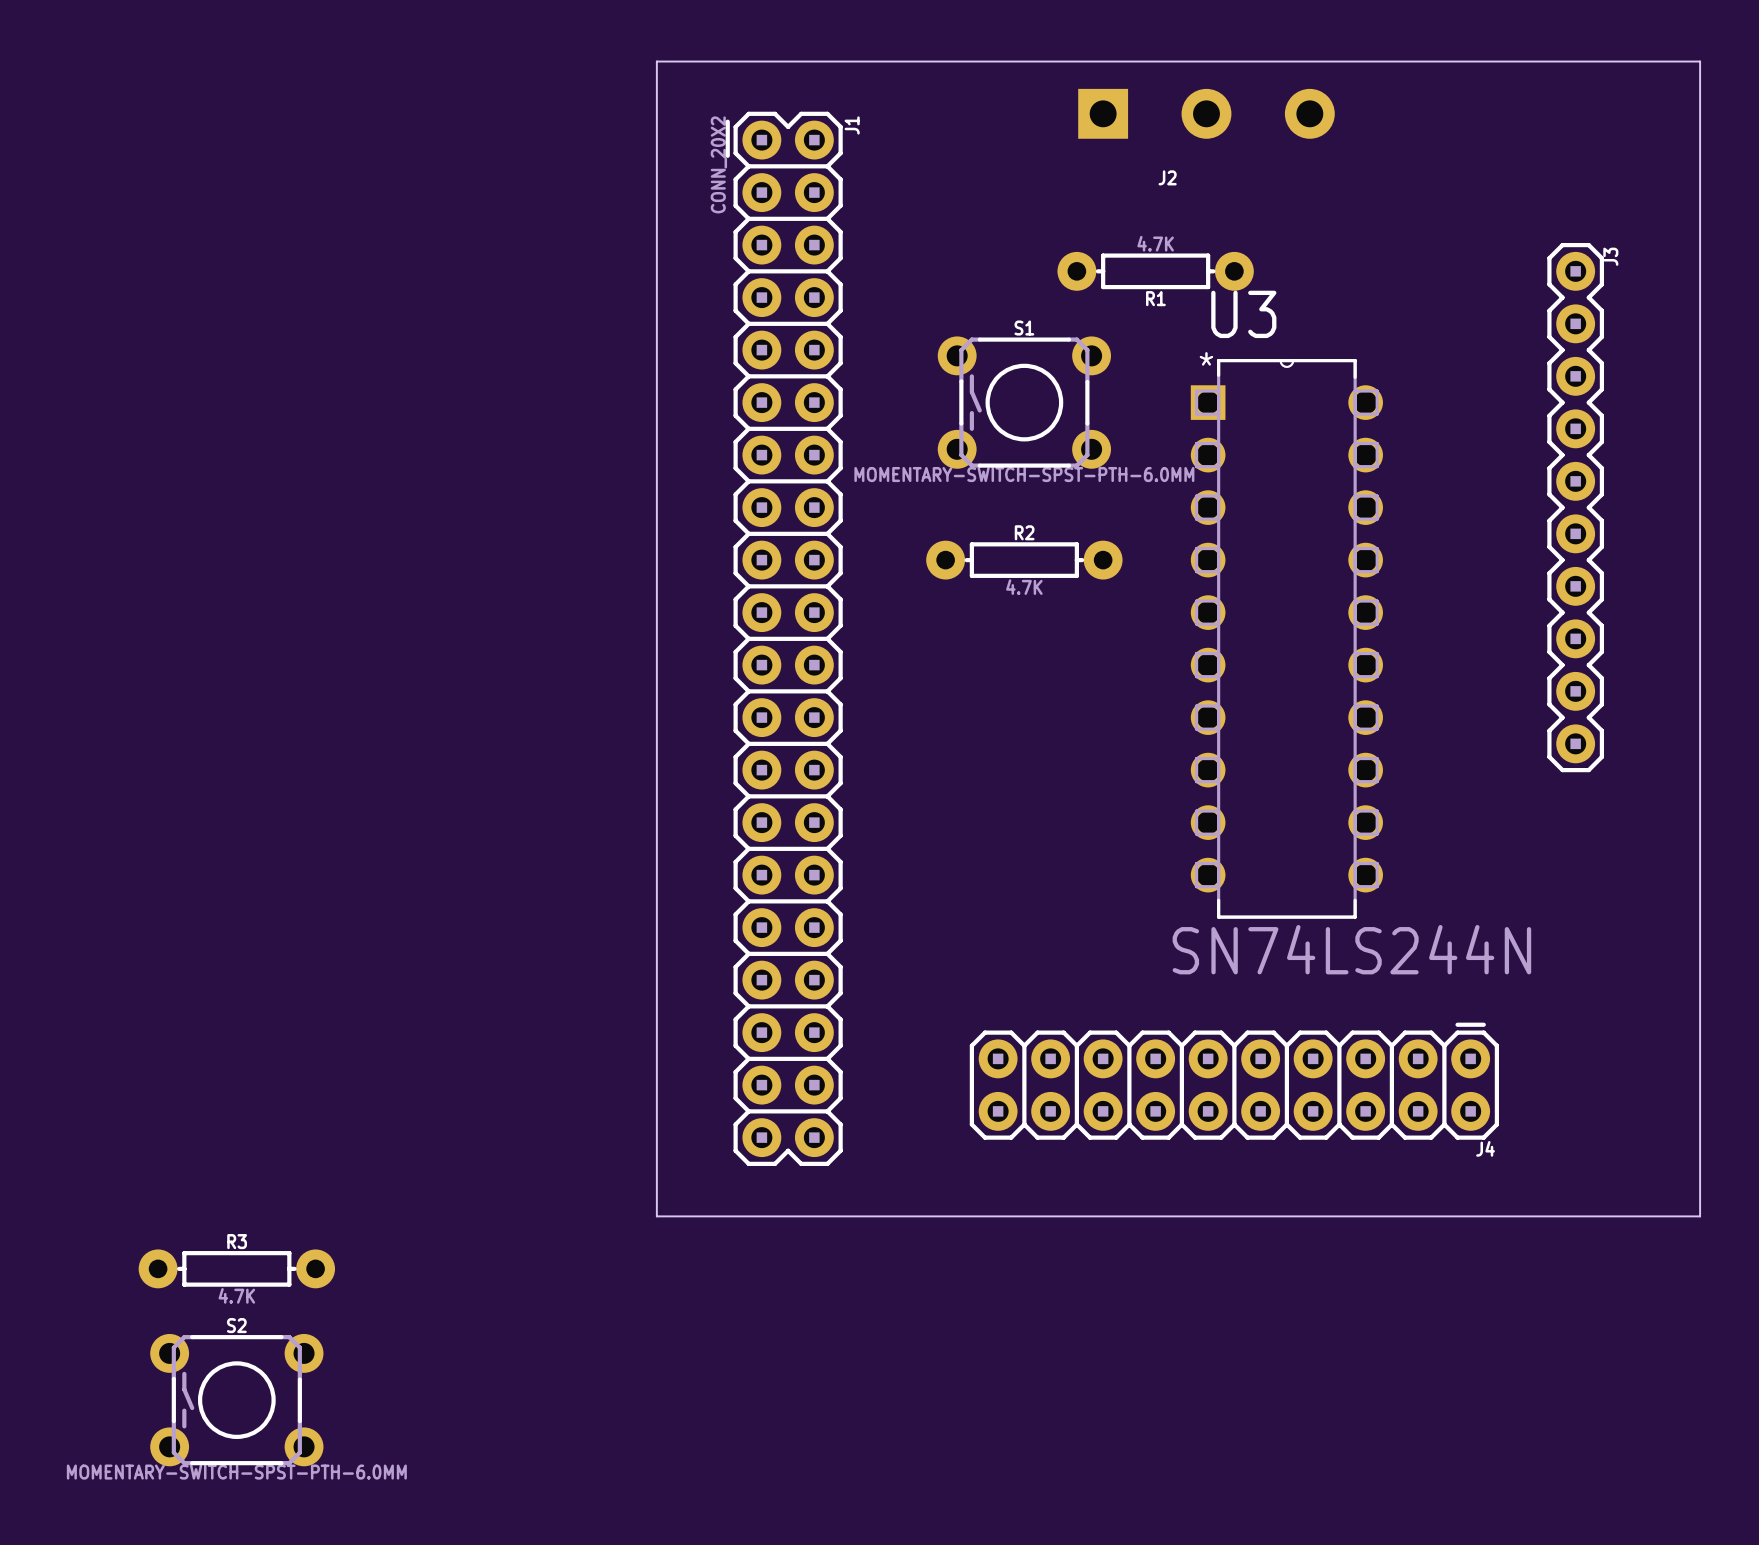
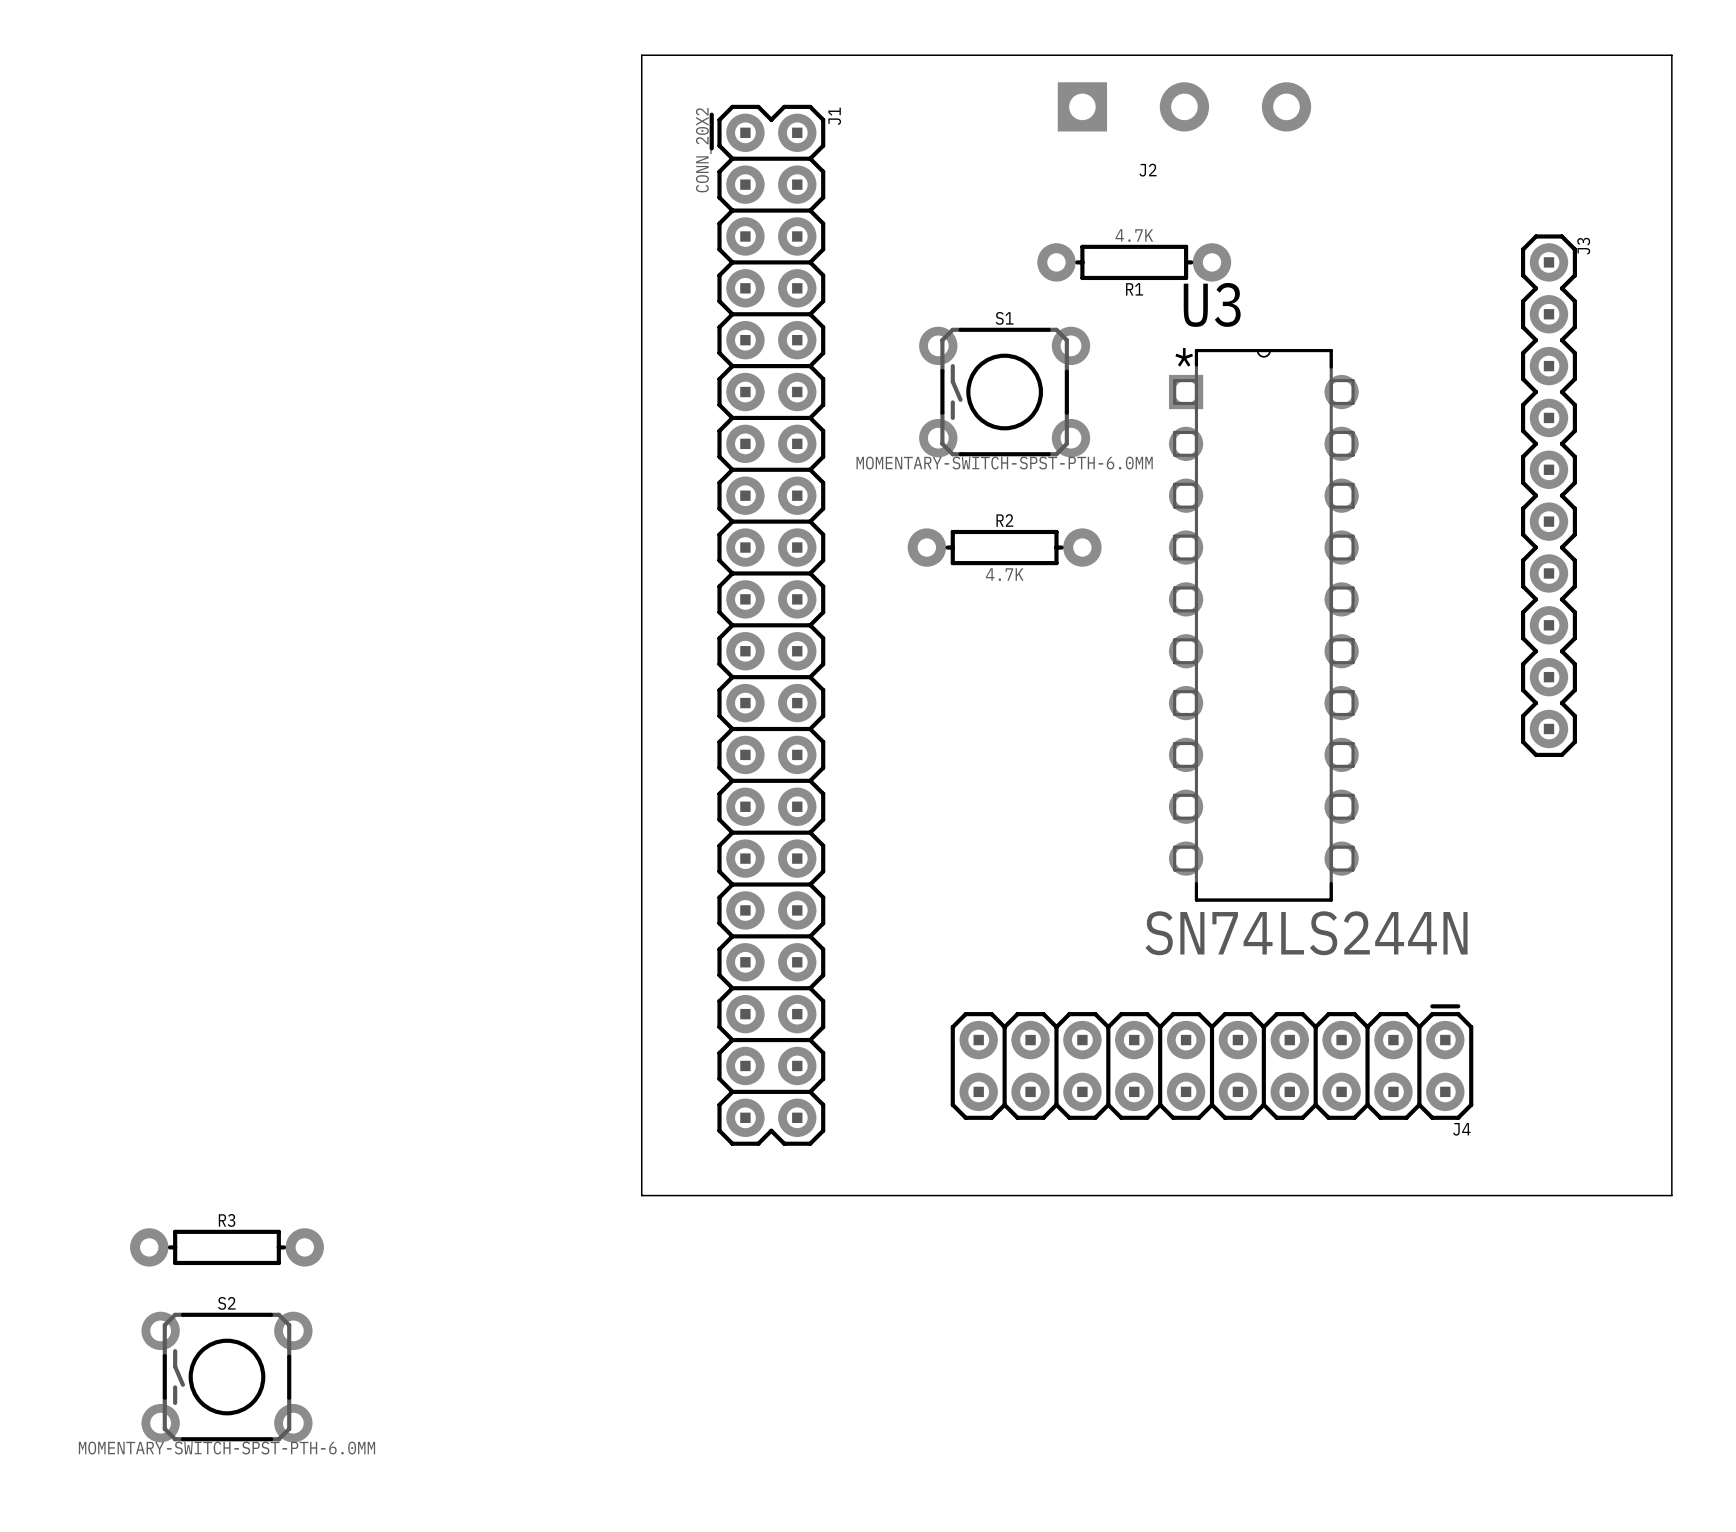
R3 value: 4.7K (236, 1295) -> none

